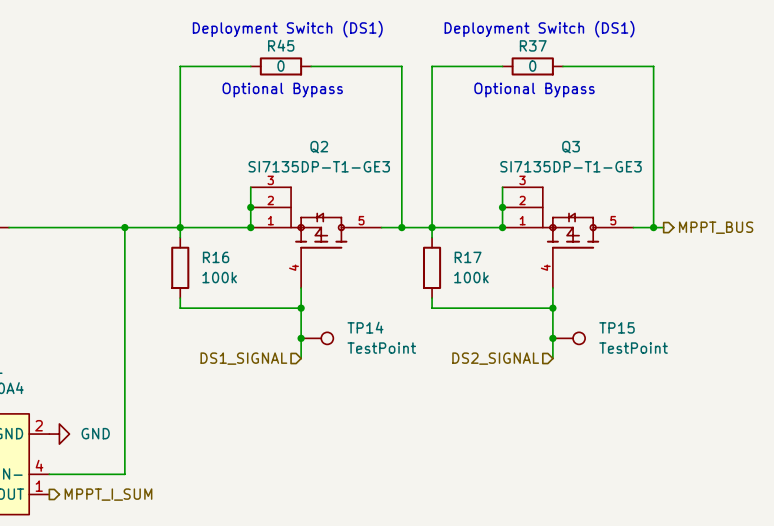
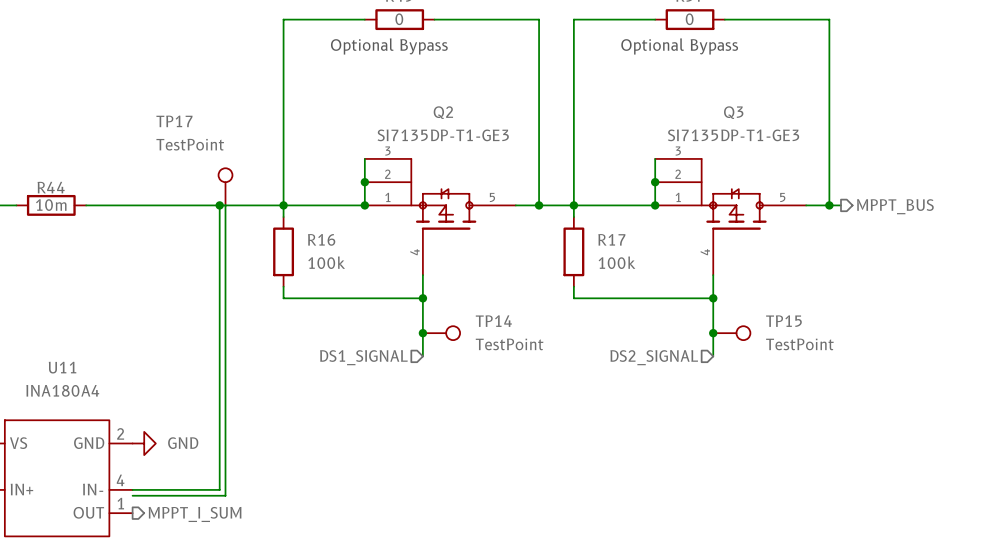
TP17: none -> TestPoint (225, 186)
wire: none -> (225, 205) (225, 495) (132, 495)

